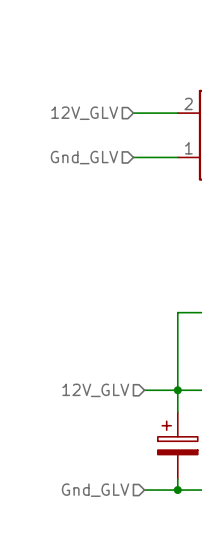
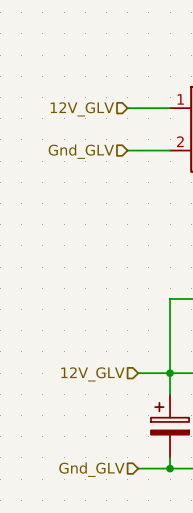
part pin number: 2 (188, 103) -> 1 (180, 99)
part pin number: 1 (188, 148) -> 2 (180, 141)

